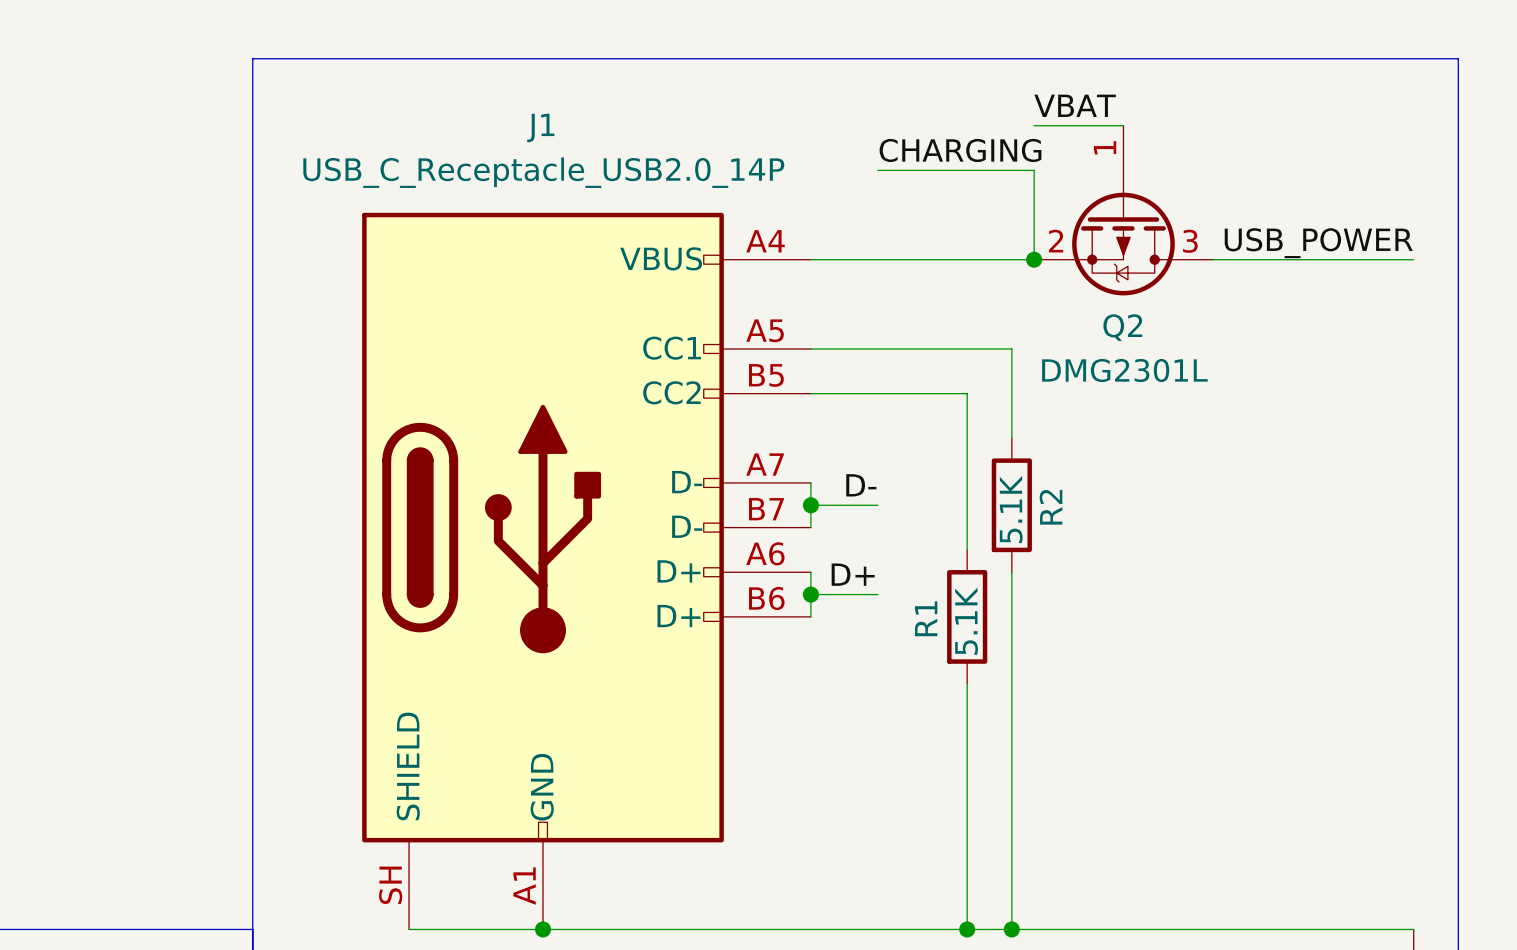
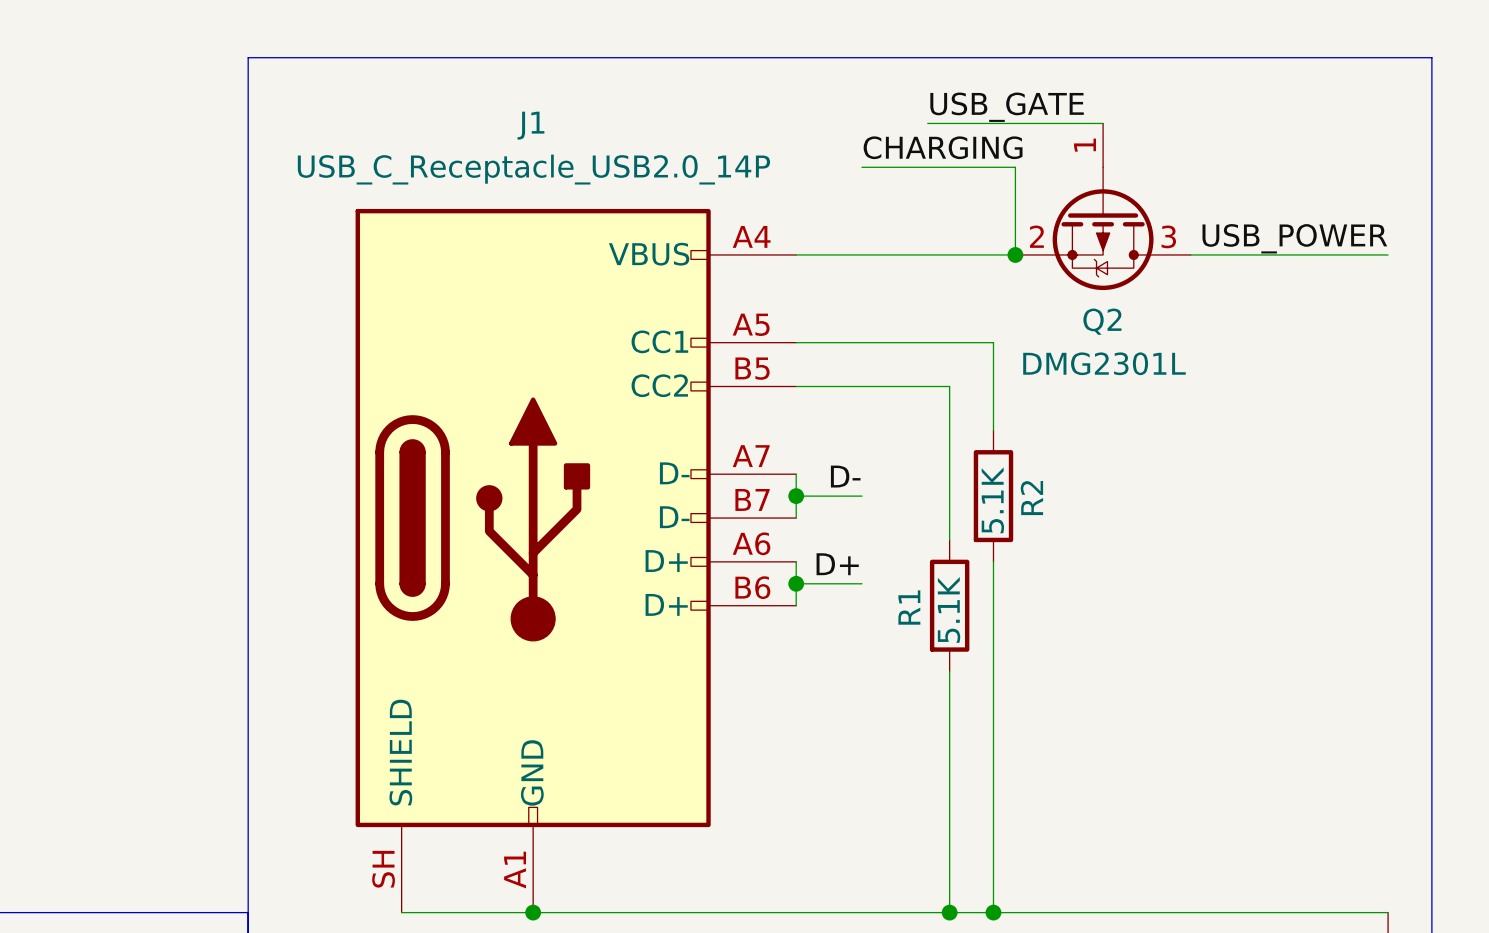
label: VBAT (1075, 105) -> none
label: none -> USB_GATE (1007, 107)
wire: none -> (927, 123) (1015, 123)

